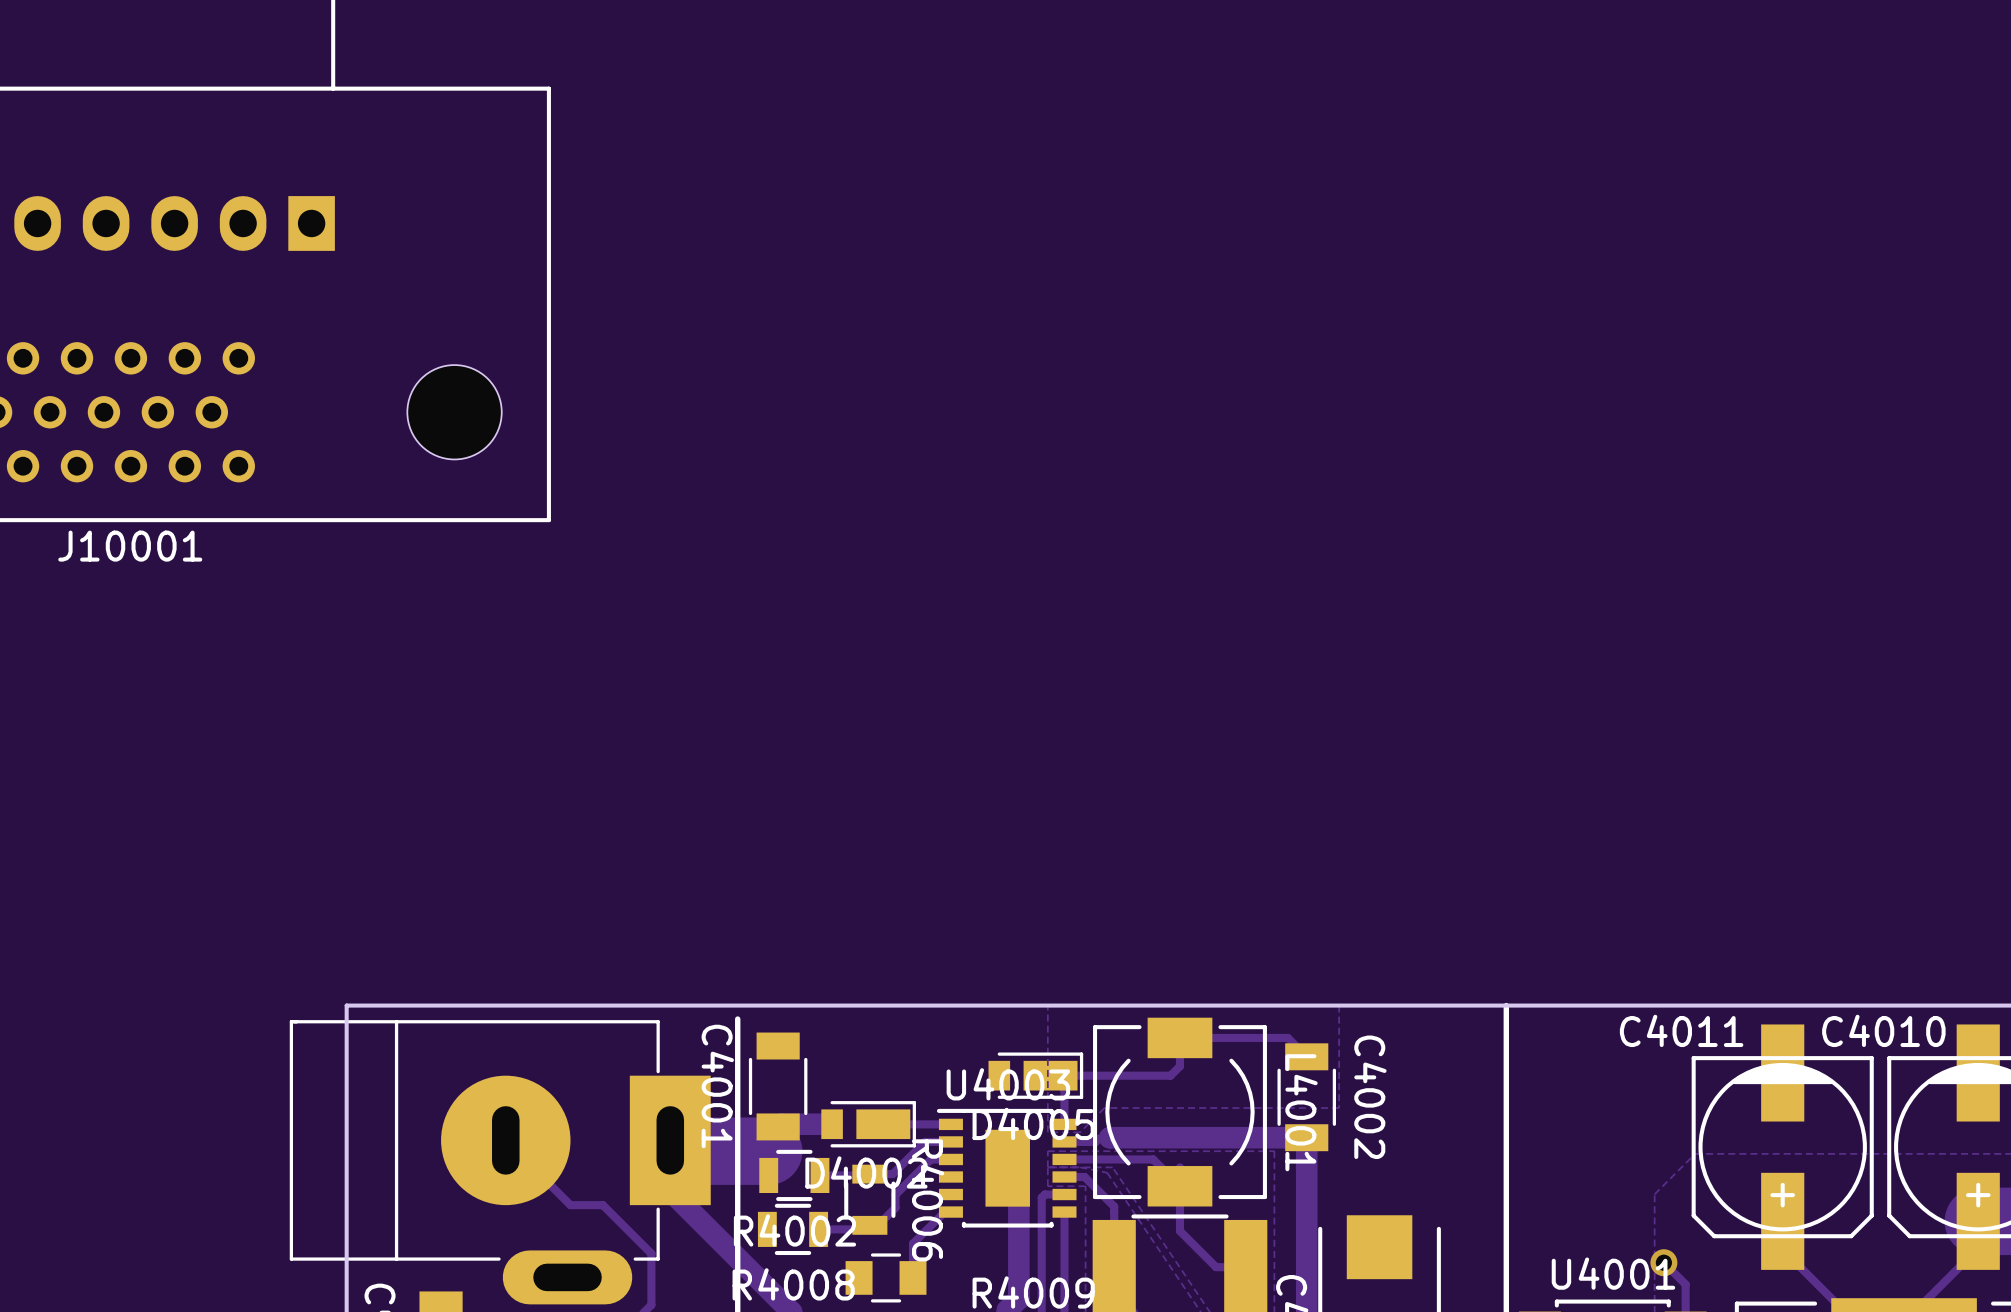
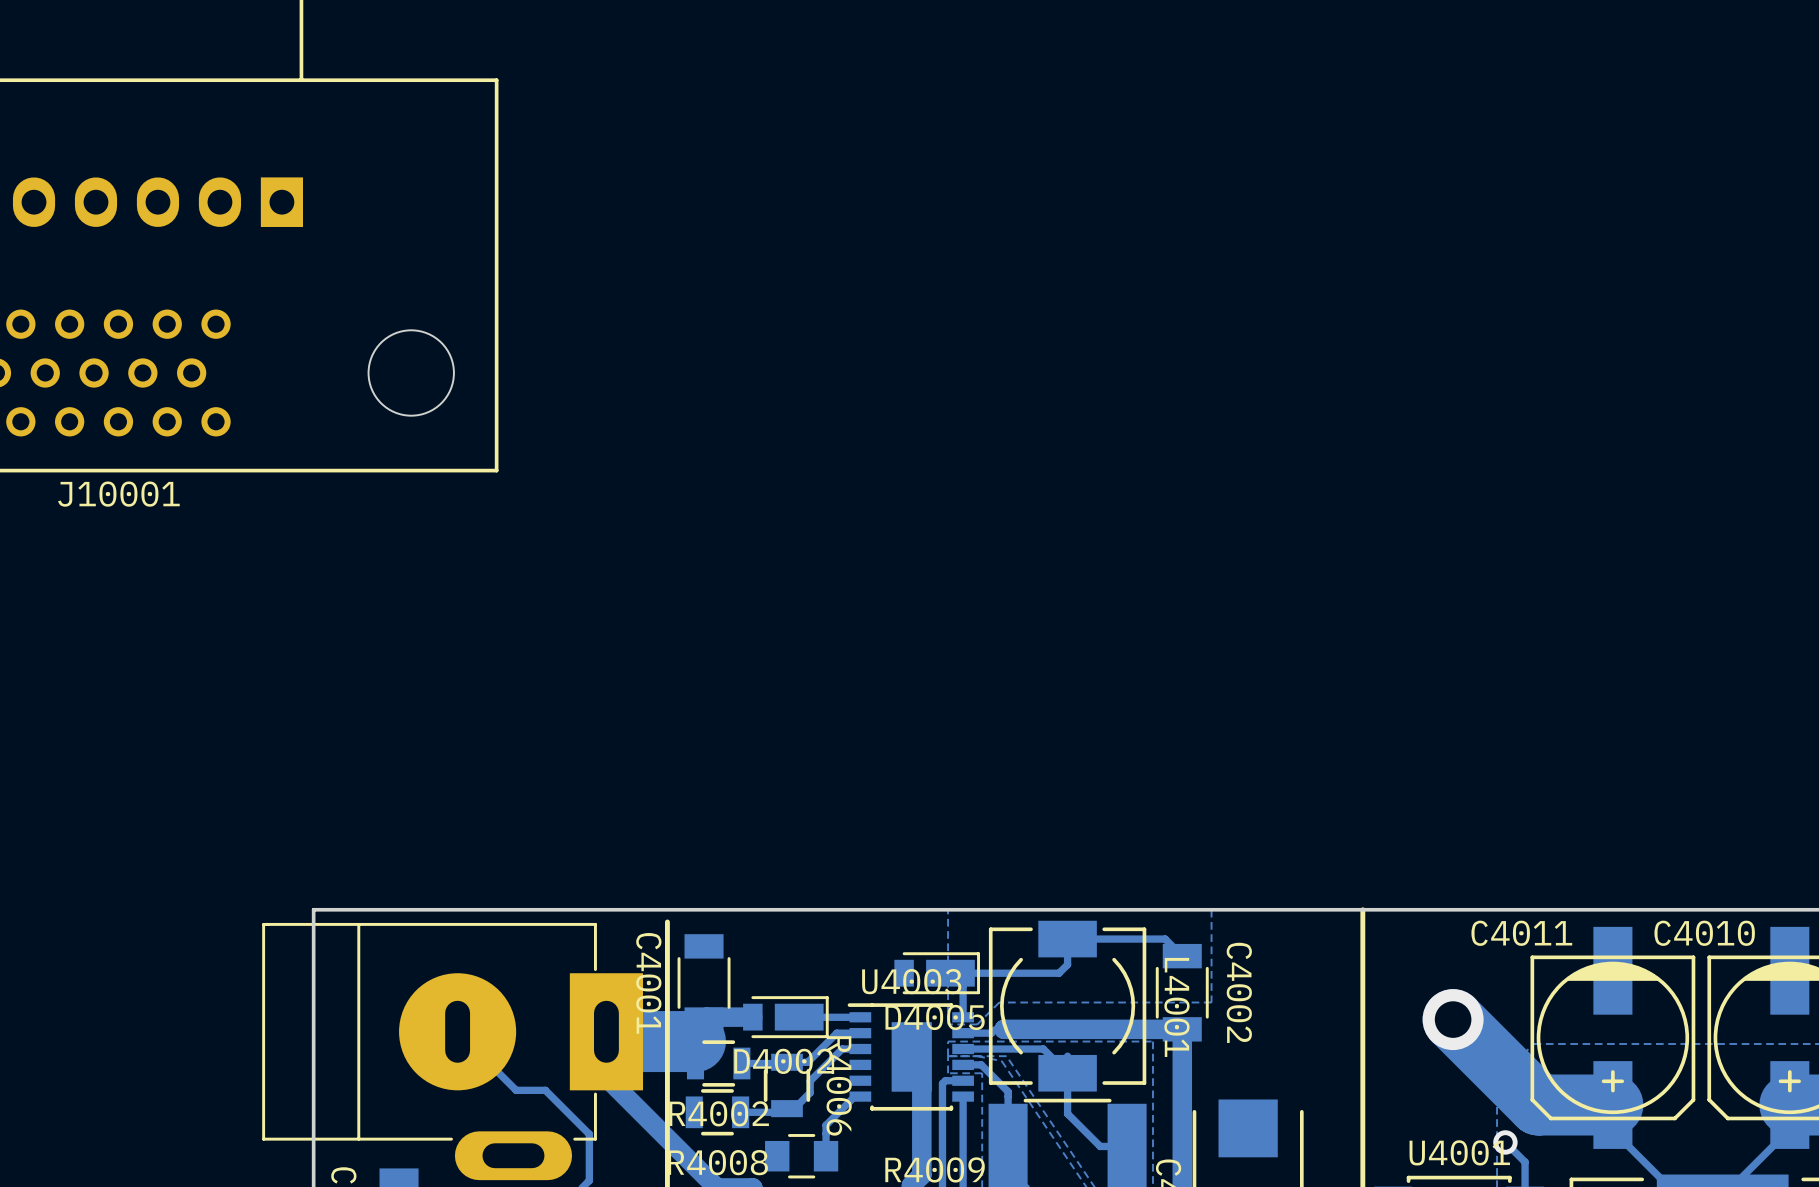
track: none -> (1453, 1019) (1538, 1105) (1612, 1105)
via: none -> (1453, 1019)

